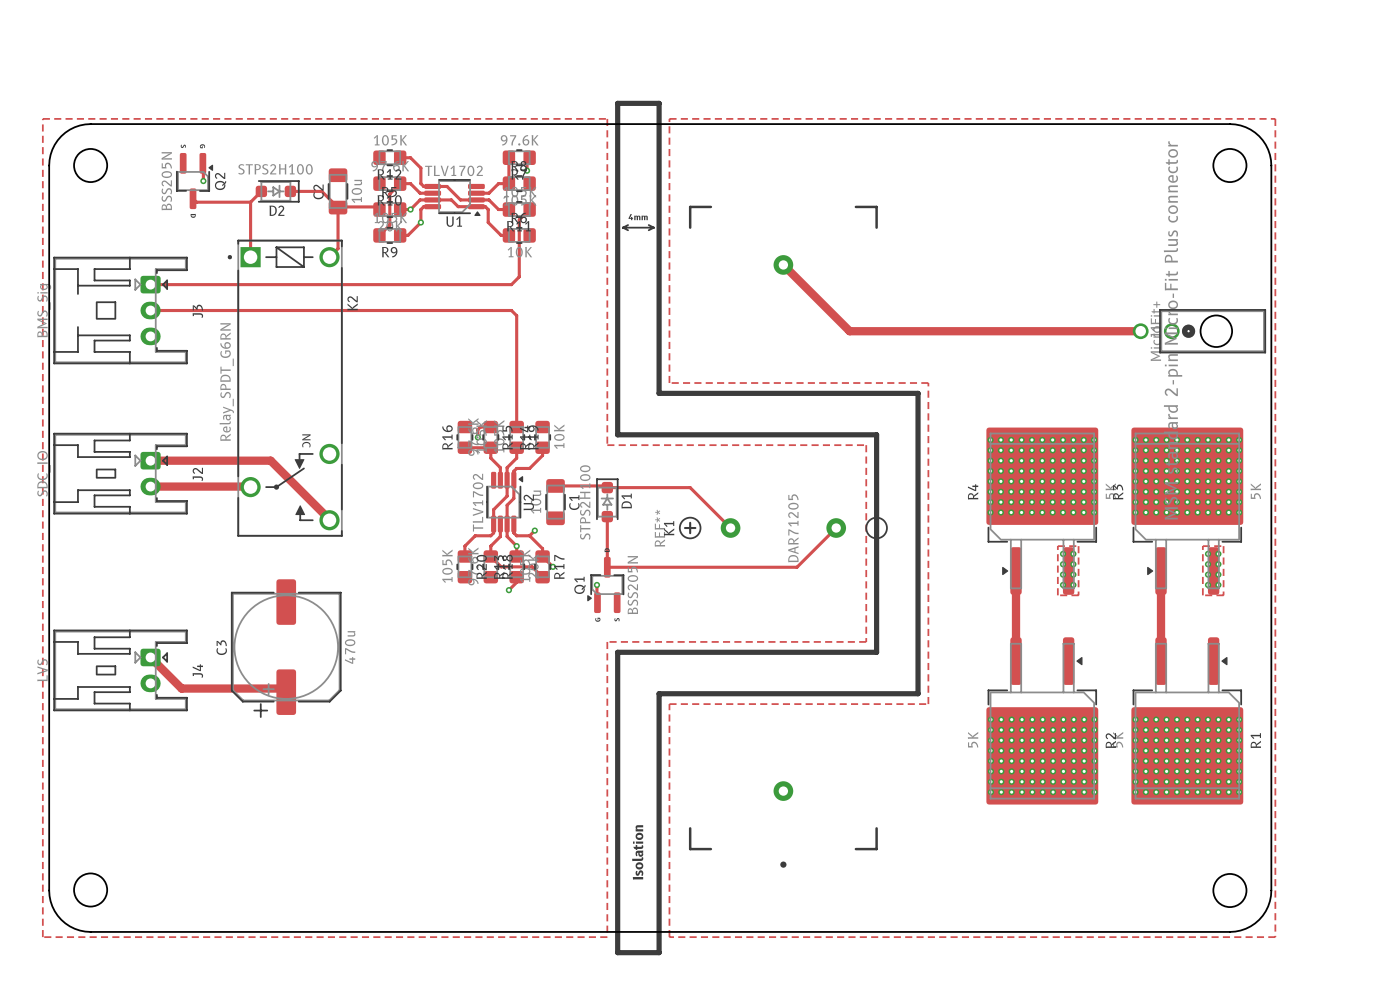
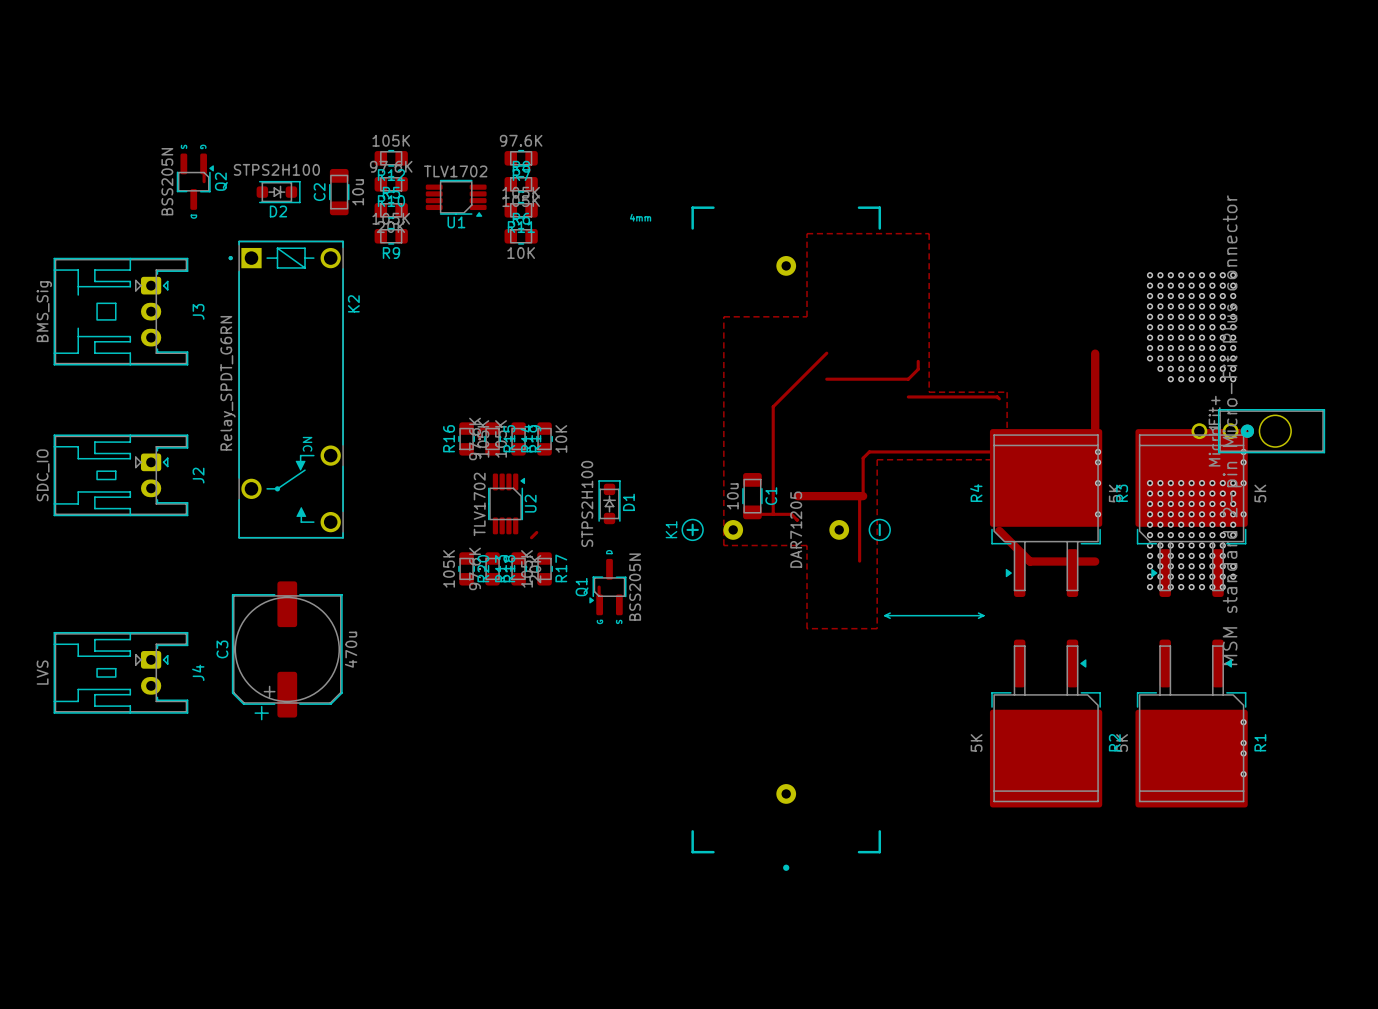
line: (617, 103) (617, 434) (876, 434) (876, 652) (617, 652) (617, 952) (659, 952) (659, 693) (918, 693) (918, 393) (659, 393) (659, 103) (617, 103) -> none
zone outline: (42, 118) (607, 118) (607, 445) (866, 445) (866, 641) (607, 641) (607, 937) (42, 937) (42, 118) -> none
zone outline: (669, 118) (1275, 118) (1275, 937) (669, 937) (669, 704) (928, 704) (928, 383) (669, 383) (669, 118) -> none
track: (400, 157) (410, 157) (420, 168) (420, 183) (423, 186) (447, 186) (460, 199) (488, 199) (498, 209) (508, 209) -> none
track: (508, 157) (508, 183) (498, 183) (488, 193) (476, 193) -> none
via: (527, 170) -> none
via: (203, 181) -> none
track: (261, 191) (250, 202) -> none
track: (290, 191) (321, 191) (338, 207) (338, 248) (329, 257) -> none
track: (432, 193) (420, 193) (410, 183) (400, 183) (389, 193) (389, 225) (379, 235) -> none
track: (193, 198) (196, 202) (250, 202) -> none
track: (250, 202) (250, 257) -> none
track: (338, 206) (376, 206) (379, 209) -> none
track: (432, 206) (423, 206) (420, 209) (420, 222) (407, 235) (400, 235) -> none
track: (400, 209) (410, 209) (420, 199) (451, 199) (458, 206) (485, 206) (488, 209) (488, 222) (501, 235) (508, 235) -> none
via: (410, 209) -> none
track: (529, 209) (519, 219) (519, 276) (511, 284) (151, 284) -> none
via: (420, 222) -> none
line: (628, 225) (622, 227) -> none
line: (648, 225) (653, 227) -> none
line: (622, 227) (628, 230) -> none
line: (622, 227) (653, 227) -> none
line: (653, 227) (648, 230) -> none
zone outline: none -> (807, 233) (807, 316) (723, 316) (723, 545) (807, 545) (807, 628) (877, 628) (877, 459) (1007, 459) (1007, 392) (929, 392) (929, 233) (807, 233)
track: (783, 264) (849, 331) (1140, 331) -> none
via: none -> (1150, 275)
via: none -> (1160, 275)
via: none -> (1170, 275)
via: none -> (1181, 275)
via: none -> (1191, 275)
via: none -> (1202, 275)
via: none -> (1212, 275)
via: none -> (1222, 275)
via: none -> (1233, 275)
via: none -> (1150, 285)
via: none -> (1160, 285)
via: none -> (1170, 285)
via: none -> (1181, 285)
via: none -> (1191, 285)
via: none -> (1202, 285)
via: none -> (1212, 285)
via: none -> (1222, 285)
via: none -> (1233, 285)
via: none -> (1150, 296)
via: none -> (1160, 296)
via: none -> (1170, 296)
via: none -> (1181, 296)
via: none -> (1191, 296)
via: none -> (1202, 296)
via: none -> (1212, 296)
via: none -> (1222, 296)
via: none -> (1233, 296)
via: none -> (1150, 306)
via: none -> (1160, 306)
via: none -> (1170, 306)
via: none -> (1181, 306)
via: none -> (1191, 306)
via: none -> (1202, 306)
via: none -> (1212, 306)
via: none -> (1222, 306)
via: none -> (1233, 306)
track: (151, 310) (511, 310) (516, 315) (516, 427) -> none
via: none -> (1150, 316)
via: none -> (1160, 316)
via: none -> (1170, 316)
via: none -> (1181, 316)
via: none -> (1191, 316)
via: none -> (1202, 316)
via: none -> (1212, 316)
via: none -> (1222, 316)
via: none -> (1233, 316)
via: none -> (1150, 327)
via: none -> (1160, 327)
via: none -> (1170, 327)
via: none -> (1181, 327)
via: none -> (1191, 327)
via: none -> (1202, 327)
via: none -> (1212, 327)
via: none -> (1222, 327)
via: none -> (1233, 327)
part position: (1199, 331) -> (1258, 431)
via: none -> (1150, 337)
via: none -> (1160, 337)
via: none -> (1170, 337)
via: none -> (1181, 337)
via: none -> (1191, 337)
via: none -> (1202, 337)
via: none -> (1212, 337)
via: none -> (1222, 337)
via: none -> (1233, 337)
via: none -> (1150, 348)
via: none -> (1160, 348)
via: none -> (1170, 348)
via: none -> (1181, 348)
via: none -> (1191, 348)
via: none -> (1202, 348)
via: none -> (1212, 348)
via: none -> (1222, 348)
via: none -> (1233, 348)
track: none -> (826, 353) (773, 406) (773, 514)
track: none -> (1095, 353) (1095, 508)
via: none -> (1150, 358)
via: none -> (1160, 358)
via: none -> (1170, 358)
via: none -> (1181, 358)
via: none -> (1191, 358)
via: none -> (1202, 358)
via: none -> (1212, 358)
via: none -> (1222, 358)
via: none -> (1233, 358)
track: none -> (918, 361) (918, 369) (908, 379) (826, 379)
via: none -> (1160, 368)
via: none -> (1170, 368)
via: none -> (1181, 368)
via: none -> (1191, 368)
via: none -> (1202, 368)
via: none -> (1212, 368)
via: none -> (1222, 368)
via: none -> (1233, 368)
via: none -> (1170, 379)
via: none -> (1181, 379)
via: none -> (1191, 379)
via: none -> (1202, 379)
via: none -> (1212, 379)
via: none -> (1222, 379)
via: none -> (1233, 379)
track: none -> (908, 396) (997, 396) (999, 398)
via: (477, 437) -> none
via: (990, 439) -> none
via: (1000, 439) -> none
via: (1011, 439) -> none
via: (1021, 439) -> none
via: (1031, 439) -> none
via: (1042, 439) -> none
via: (1052, 439) -> none
via: (1063, 439) -> none
via: (1073, 439) -> none
via: (1083, 439) -> none
via: (1094, 439) -> none
via: (1135, 439) -> none
via: (1145, 439) -> none
via: (1156, 439) -> none
via: (1166, 439) -> none
via: (1176, 439) -> none
via: (1187, 439) -> none
via: (1197, 439) -> none
via: (1208, 439) -> none
via: (1218, 439) -> none
via: (1228, 439) -> none
via: (1239, 439) -> none
track: (464, 447) (490, 447) (490, 458) (500, 467) (500, 480) -> none
track: (516, 447) (516, 458) (507, 467) (507, 496) (493, 509) (493, 532) (490, 535) (475, 535) (464, 546) (464, 556) -> none
track: (542, 447) (542, 455) (529, 468) (516, 468) (513, 471) (513, 498) (507, 505) (507, 536) (516, 546) (516, 556) -> none
via: (990, 450) -> none
track: none -> (999, 451) (869, 451) (863, 458) (863, 496)
via: (1000, 450) -> none
via: (1011, 450) -> none
via: (1021, 450) -> none
via: (1031, 450) -> none
via: (1042, 450) -> none
via: (1052, 450) -> none
via: (1063, 450) -> none
via: (1073, 450) -> none
via: (1083, 450) -> none
via: (1135, 450) -> none
via: (1145, 450) -> none
via: (1156, 450) -> none
via: (1166, 450) -> none
via: (1176, 450) -> none
via: (1187, 450) -> none
via: (1197, 450) -> none
via: (1208, 450) -> none
via: (1218, 450) -> none
via: (1228, 450) -> none
track: (150, 460) (270, 460) (329, 520) -> none
via: (990, 460) -> none
via: (1000, 460) -> none
via: (1011, 460) -> none
via: (1021, 460) -> none
via: (1031, 460) -> none
via: (1042, 460) -> none
via: (1052, 460) -> none
via: (1063, 460) -> none
via: (1073, 460) -> none
via: (1083, 460) -> none
via: (1135, 460) -> none
via: (1145, 460) -> none
via: (1156, 460) -> none
via: (1166, 460) -> none
via: (1176, 460) -> none
via: (1187, 460) -> none
via: (1197, 460) -> none
via: (1208, 460) -> none
via: (1218, 460) -> none
via: (1228, 460) -> none
via: (990, 471) -> none
via: (1000, 471) -> none
via: (1011, 471) -> none
via: (1021, 471) -> none
via: (1031, 471) -> none
via: (1042, 471) -> none
via: (1052, 471) -> none
via: (1063, 471) -> none
via: (1073, 471) -> none
via: (1083, 471) -> none
via: (1094, 471) -> none
via: (1135, 471) -> none
via: (1145, 471) -> none
via: (1156, 471) -> none
via: (1166, 471) -> none
via: (1176, 471) -> none
via: (1187, 471) -> none
via: (1197, 471) -> none
via: (1208, 471) -> none
via: (1218, 471) -> none
via: (1228, 471) -> none
via: (1239, 471) -> none
via: (990, 481) -> none
via: (1000, 481) -> none
via: (1011, 481) -> none
via: (1021, 481) -> none
via: (1031, 481) -> none
via: (1042, 481) -> none
via: (1052, 481) -> none
via: (1063, 481) -> none
via: (1073, 481) -> none
via: (1083, 481) -> none
via: (1135, 481) -> none
track: (555, 485) (690, 487) (730, 528) -> none
track: (150, 486) (250, 486) -> none
via: (990, 491) -> none
via: (1000, 491) -> none
via: (1011, 491) -> none
via: (1021, 491) -> none
via: (1031, 491) -> none
via: (1042, 491) -> none
via: (1052, 491) -> none
via: (1063, 491) -> none
via: (1073, 491) -> none
via: (1083, 491) -> none
via: (1094, 491) -> none
via: (1135, 491) -> none
via: (1239, 491) -> none
track: none -> (797, 496) (863, 496)
track: none -> (863, 496) (859, 499) (859, 561)
C1 position: (555, 502) -> (752, 496)
via: (990, 502) -> none
via: (1000, 502) -> none
via: (1011, 502) -> none
via: (1021, 502) -> none
via: (1031, 502) -> none
via: (1042, 502) -> none
via: (1052, 502) -> none
via: (1063, 502) -> none
via: (1073, 502) -> none
via: (1083, 502) -> none
via: (1094, 502) -> none
via: (1135, 502) -> none
via: (1239, 502) -> none
track: none -> (752, 512) (754, 514) (791, 514) (797, 520)
via: (990, 512) -> none
via: (1000, 512) -> none
via: (1011, 512) -> none
via: (1021, 512) -> none
via: (1031, 512) -> none
via: (1042, 512) -> none
via: (1052, 512) -> none
via: (1063, 512) -> none
via: (1073, 512) -> none
via: (1083, 512) -> none
via: (1135, 512) -> none
track: (607, 516) (607, 567) (796, 567) (836, 528) -> none
via: none -> (1150, 524)
via: none -> (1160, 524)
via: none -> (1170, 524)
via: none -> (1181, 524)
via: none -> (1191, 524)
via: none -> (1202, 524)
via: none -> (1212, 524)
via: none -> (1222, 524)
via: none -> (1233, 524)
track: (500, 524) (500, 536) (490, 546) (490, 556) (501, 566) (532, 566) (542, 577) -> none
track: (513, 524) (513, 532) (516, 535) (529, 535) (542, 548) (542, 556) (552, 566) -> none
REF**: (660, 528) -> none
track: none -> (999, 530) (1029, 561) (1095, 561)
via: (534, 530) -> none
via: none -> (1150, 535)
via: none -> (1160, 535)
via: none -> (1170, 535)
via: none -> (1181, 535)
via: none -> (1191, 535)
via: none -> (1202, 535)
via: none -> (1212, 535)
via: none -> (1222, 535)
via: none -> (1233, 535)
via: none -> (1150, 545)
via: none -> (1160, 545)
via: none -> (1170, 545)
via: none -> (1181, 545)
via: none -> (1191, 545)
via: none -> (1202, 545)
via: none -> (1212, 545)
via: none -> (1222, 545)
via: (516, 546) -> none
zone outline: (1057, 546) (1078, 546) (1078, 595) (1057, 595) (1057, 546) -> none
zone outline: (1202, 546) (1223, 546) (1223, 595) (1202, 595) (1202, 546) -> none
via: (1063, 553) -> none
via: (1073, 553) -> none
via: none -> (1150, 555)
via: none -> (1160, 555)
via: none -> (1170, 555)
via: none -> (1181, 555)
via: none -> (1191, 555)
via: none -> (1202, 555)
via: (1063, 564) -> none
via: (1073, 564) -> none
via: none -> (1150, 566)
via: none -> (1160, 566)
via: none -> (1170, 566)
via: none -> (1181, 566)
via: none -> (1191, 566)
via: none -> (1202, 566)
via: none -> (1233, 566)
via: (552, 566) -> none
track: (1016, 570) (1016, 661) -> none
track: (1161, 570) (1161, 661) -> none
via: (1063, 574) -> none
via: (1073, 574) -> none
via: none -> (1150, 576)
via: none -> (1160, 576)
via: none -> (1170, 576)
via: none -> (1181, 576)
via: none -> (1191, 576)
via: none -> (1202, 576)
via: none -> (1233, 576)
track: (516, 577) (516, 582) (508, 590) -> none
via: (596, 584) -> none
via: (1063, 584) -> none
via: (1073, 584) -> none
via: none -> (1150, 587)
via: none -> (1160, 587)
via: none -> (1170, 587)
via: none -> (1181, 587)
via: none -> (1191, 587)
via: none -> (1202, 587)
via: (508, 590) -> none
line: none -> (890, 613) (884, 615)
line: none -> (978, 613) (983, 615)
line: none -> (884, 615) (890, 618)
line: none -> (884, 615) (983, 615)
line: none -> (983, 615) (978, 618)
track: (150, 657) (181, 688) (282, 688) (286, 692) -> none
via: (990, 719) -> none
via: (1001, 719) -> none
via: (1011, 719) -> none
via: (1022, 719) -> none
via: (1032, 719) -> none
via: (1042, 719) -> none
via: (1053, 719) -> none
via: (1063, 719) -> none
via: (1073, 719) -> none
via: (1084, 719) -> none
via: (1094, 719) -> none
via: (1135, 719) -> none
via: (1145, 719) -> none
via: (1156, 719) -> none
via: (1166, 719) -> none
via: (1176, 719) -> none
via: (1187, 719) -> none
via: (1197, 719) -> none
via: (1208, 719) -> none
via: (1218, 719) -> none
via: (1228, 719) -> none
via: (990, 729) -> none
via: (1001, 729) -> none
via: (1011, 729) -> none
via: (1022, 729) -> none
via: (1032, 729) -> none
via: (1042, 729) -> none
via: (1053, 729) -> none
via: (1063, 729) -> none
via: (1073, 729) -> none
via: (1084, 729) -> none
via: (1094, 729) -> none
via: (1135, 729) -> none
via: (1145, 729) -> none
via: (1156, 729) -> none
via: (1166, 729) -> none
via: (1176, 729) -> none
via: (1187, 729) -> none
via: (1197, 729) -> none
via: (1208, 729) -> none
via: (1218, 729) -> none
via: (1228, 729) -> none
via: (1239, 729) -> none
via: (990, 740) -> none
via: (1001, 740) -> none
via: (1011, 740) -> none
via: (1022, 740) -> none
via: (1032, 740) -> none
via: (1042, 740) -> none
via: (1053, 740) -> none
via: (1063, 740) -> none
via: (1073, 740) -> none
via: (1084, 740) -> none
via: (1094, 740) -> none
via: (1135, 740) -> none
via: (1145, 740) -> none
via: (1156, 740) -> none
via: (1166, 740) -> none
via: (1176, 740) -> none
via: (1187, 740) -> none
via: (1197, 740) -> none
via: (1208, 740) -> none
via: (1218, 740) -> none
via: (1228, 740) -> none
via: (990, 750) -> none
via: (1001, 750) -> none
via: (1011, 750) -> none
via: (1022, 750) -> none
via: (1032, 750) -> none
via: (1042, 750) -> none
via: (1053, 750) -> none
via: (1063, 750) -> none
via: (1073, 750) -> none
via: (1084, 750) -> none
via: (1094, 750) -> none
via: (1135, 750) -> none
via: (1145, 750) -> none
via: (1156, 750) -> none
via: (1166, 750) -> none
via: (1176, 750) -> none
via: (1187, 750) -> none
via: (1197, 750) -> none
via: (1208, 750) -> none
via: (1218, 750) -> none
via: (1228, 750) -> none
via: (990, 761) -> none
via: (1001, 761) -> none
via: (1011, 761) -> none
via: (1022, 761) -> none
via: (1032, 761) -> none
via: (1042, 761) -> none
via: (1053, 761) -> none
via: (1063, 761) -> none
via: (1073, 761) -> none
via: (1084, 761) -> none
via: (1094, 761) -> none
via: (1135, 761) -> none
via: (1145, 761) -> none
via: (1156, 761) -> none
via: (1166, 761) -> none
via: (1176, 761) -> none
via: (1187, 761) -> none
via: (1197, 761) -> none
via: (1208, 761) -> none
via: (1218, 761) -> none
via: (1228, 761) -> none
via: (1239, 761) -> none
via: (990, 771) -> none
via: (1001, 771) -> none
via: (1011, 771) -> none
via: (1022, 771) -> none
via: (1032, 771) -> none
via: (1042, 771) -> none
via: (1053, 771) -> none
via: (1063, 771) -> none
via: (1073, 771) -> none
via: (1084, 771) -> none
via: (1094, 771) -> none
via: (1135, 771) -> none
via: (1145, 771) -> none
via: (1156, 771) -> none
via: (1166, 771) -> none
via: (1176, 771) -> none
via: (1187, 771) -> none
via: (1197, 771) -> none
via: (1208, 771) -> none
via: (1218, 771) -> none
via: (1228, 771) -> none
via: (990, 781) -> none
via: (1001, 781) -> none
via: (1011, 781) -> none
via: (1022, 781) -> none
via: (1032, 781) -> none
via: (1042, 781) -> none
via: (1053, 781) -> none
via: (1063, 781) -> none
via: (1073, 781) -> none
via: (1084, 781) -> none
via: (1094, 781) -> none
via: (1135, 781) -> none
via: (1145, 781) -> none
via: (1156, 781) -> none
via: (1166, 781) -> none
via: (1176, 781) -> none
via: (1187, 781) -> none
via: (1197, 781) -> none
via: (1208, 781) -> none
via: (1218, 781) -> none
via: (1228, 781) -> none
via: (1239, 781) -> none
via: (990, 792) -> none
via: (1001, 792) -> none
via: (1011, 792) -> none
via: (1022, 792) -> none
via: (1032, 792) -> none
via: (1042, 792) -> none
via: (1053, 792) -> none
via: (1063, 792) -> none
via: (1073, 792) -> none
via: (1084, 792) -> none
via: (1094, 792) -> none
via: (1135, 792) -> none
via: (1145, 792) -> none
via: (1156, 792) -> none
via: (1166, 792) -> none
via: (1176, 792) -> none
via: (1187, 792) -> none
via: (1197, 792) -> none
via: (1208, 792) -> none
via: (1218, 792) -> none
via: (1228, 792) -> none
via: (1239, 792) -> none
text: Isolation (637, 852) -> none

